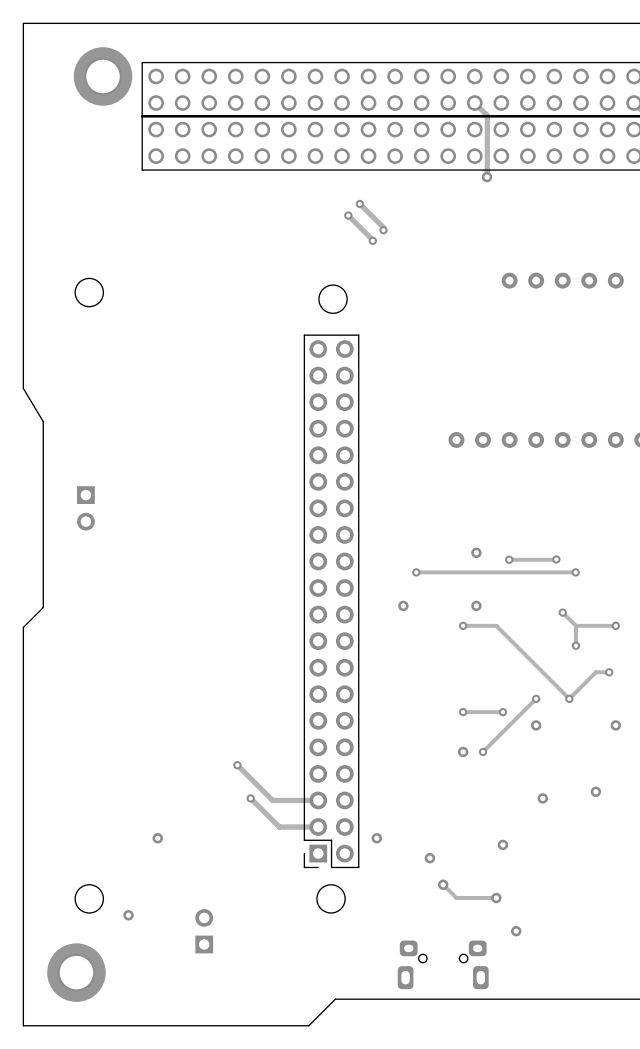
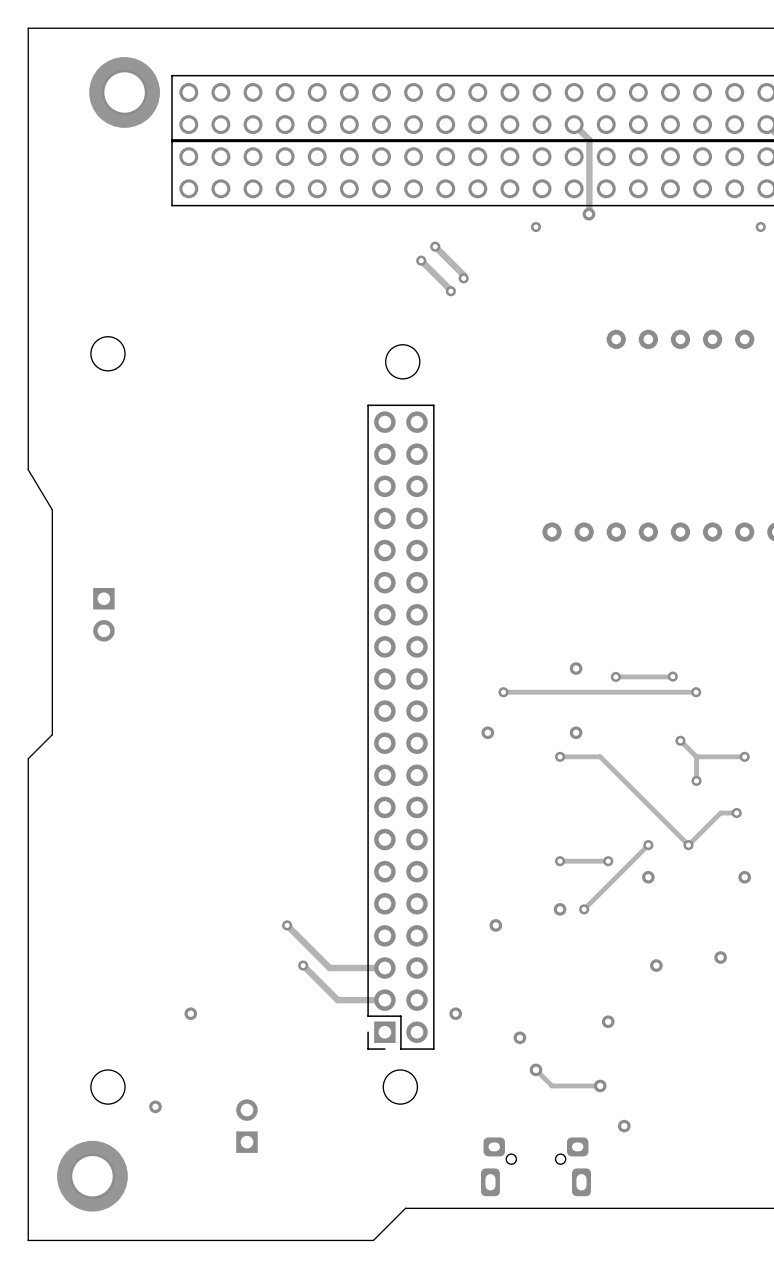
via: none -> (535, 227)
via: none -> (760, 227)
via: none -> (495, 925)

